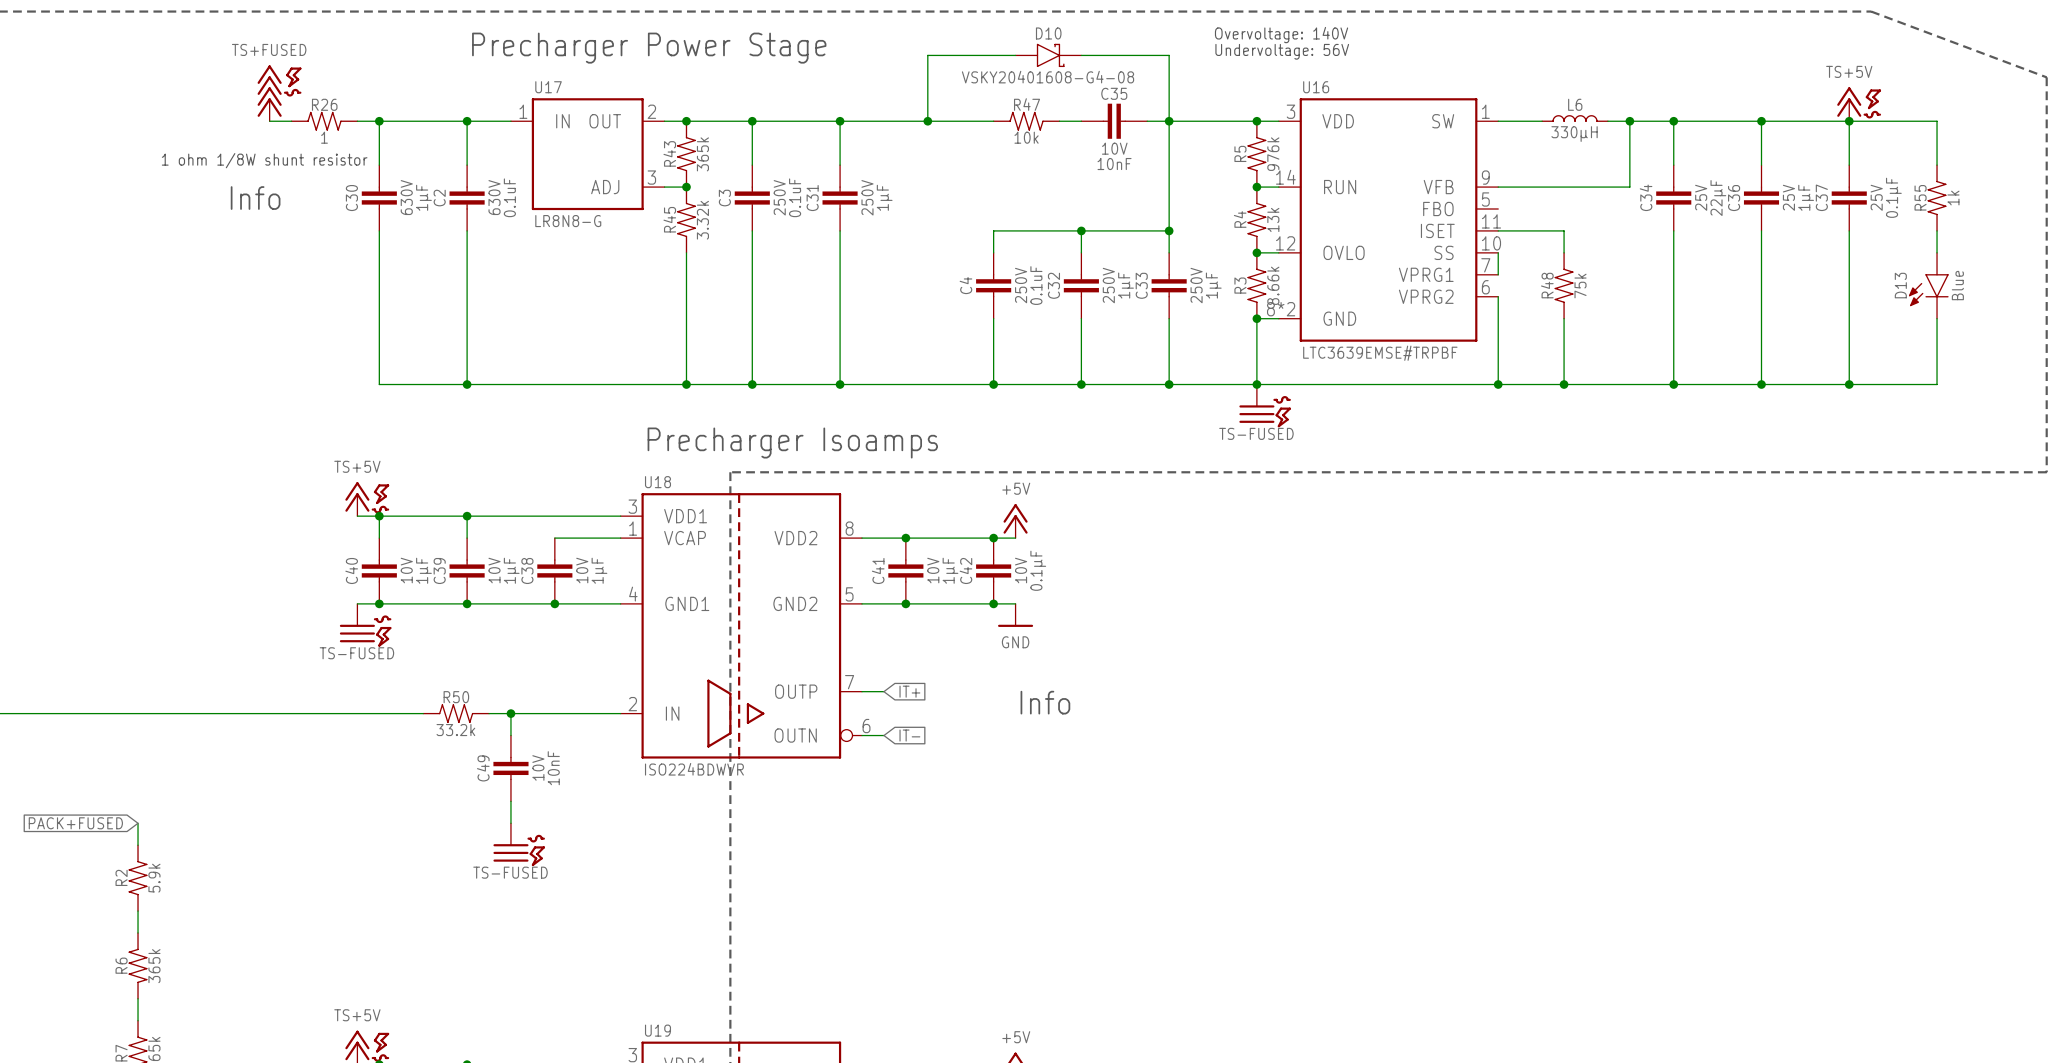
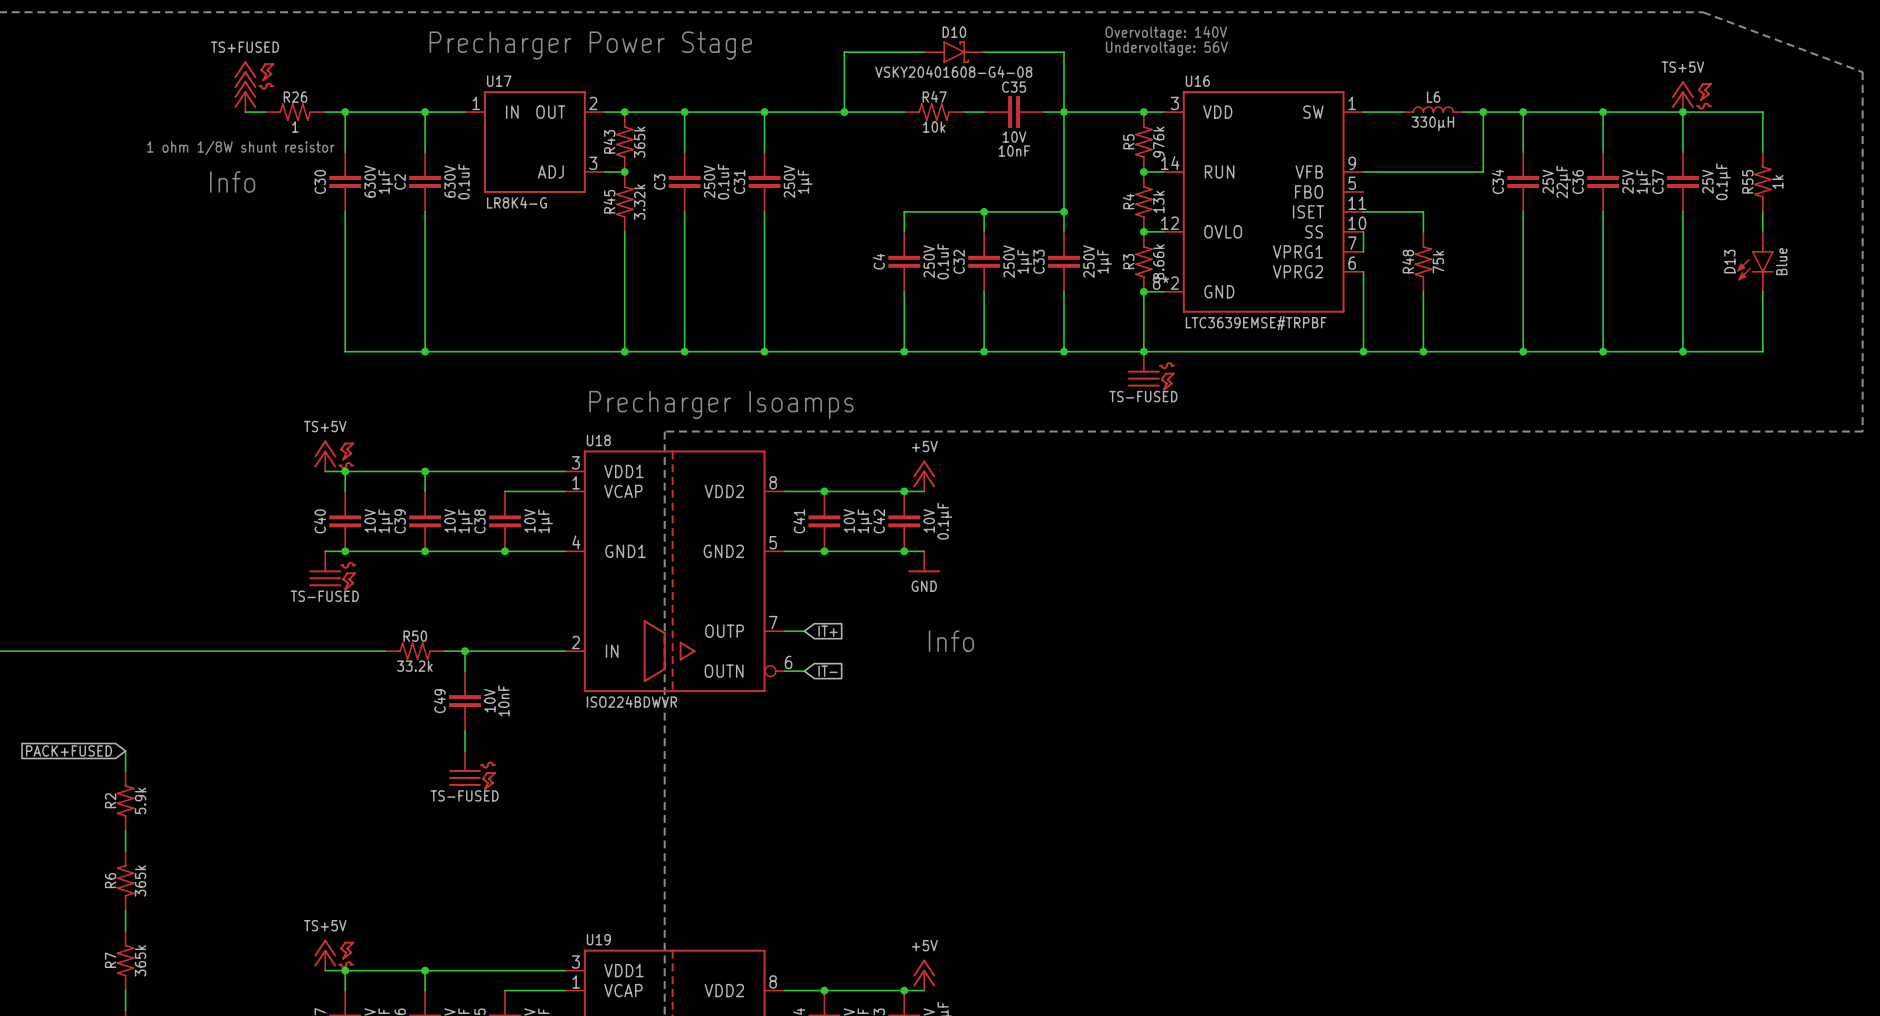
U17 text: LR8N8-G (568, 221) -> LR8K4-G (516, 202)

